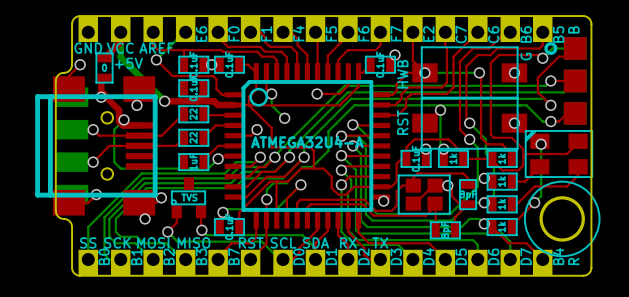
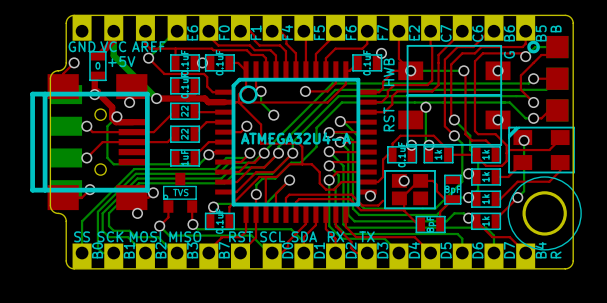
top track: (468, 184) (468, 178) (463, 173) (417, 173) (413, 177) (413, 185) (402, 185) (396, 191) (396, 205) -> none
via position: (447, 185) -> (404, 180)
top track: (418, 215) (425, 215) (435, 206) (435, 203) (435, 230) -> (404, 198) (404, 210) (417, 224) (421, 224)

